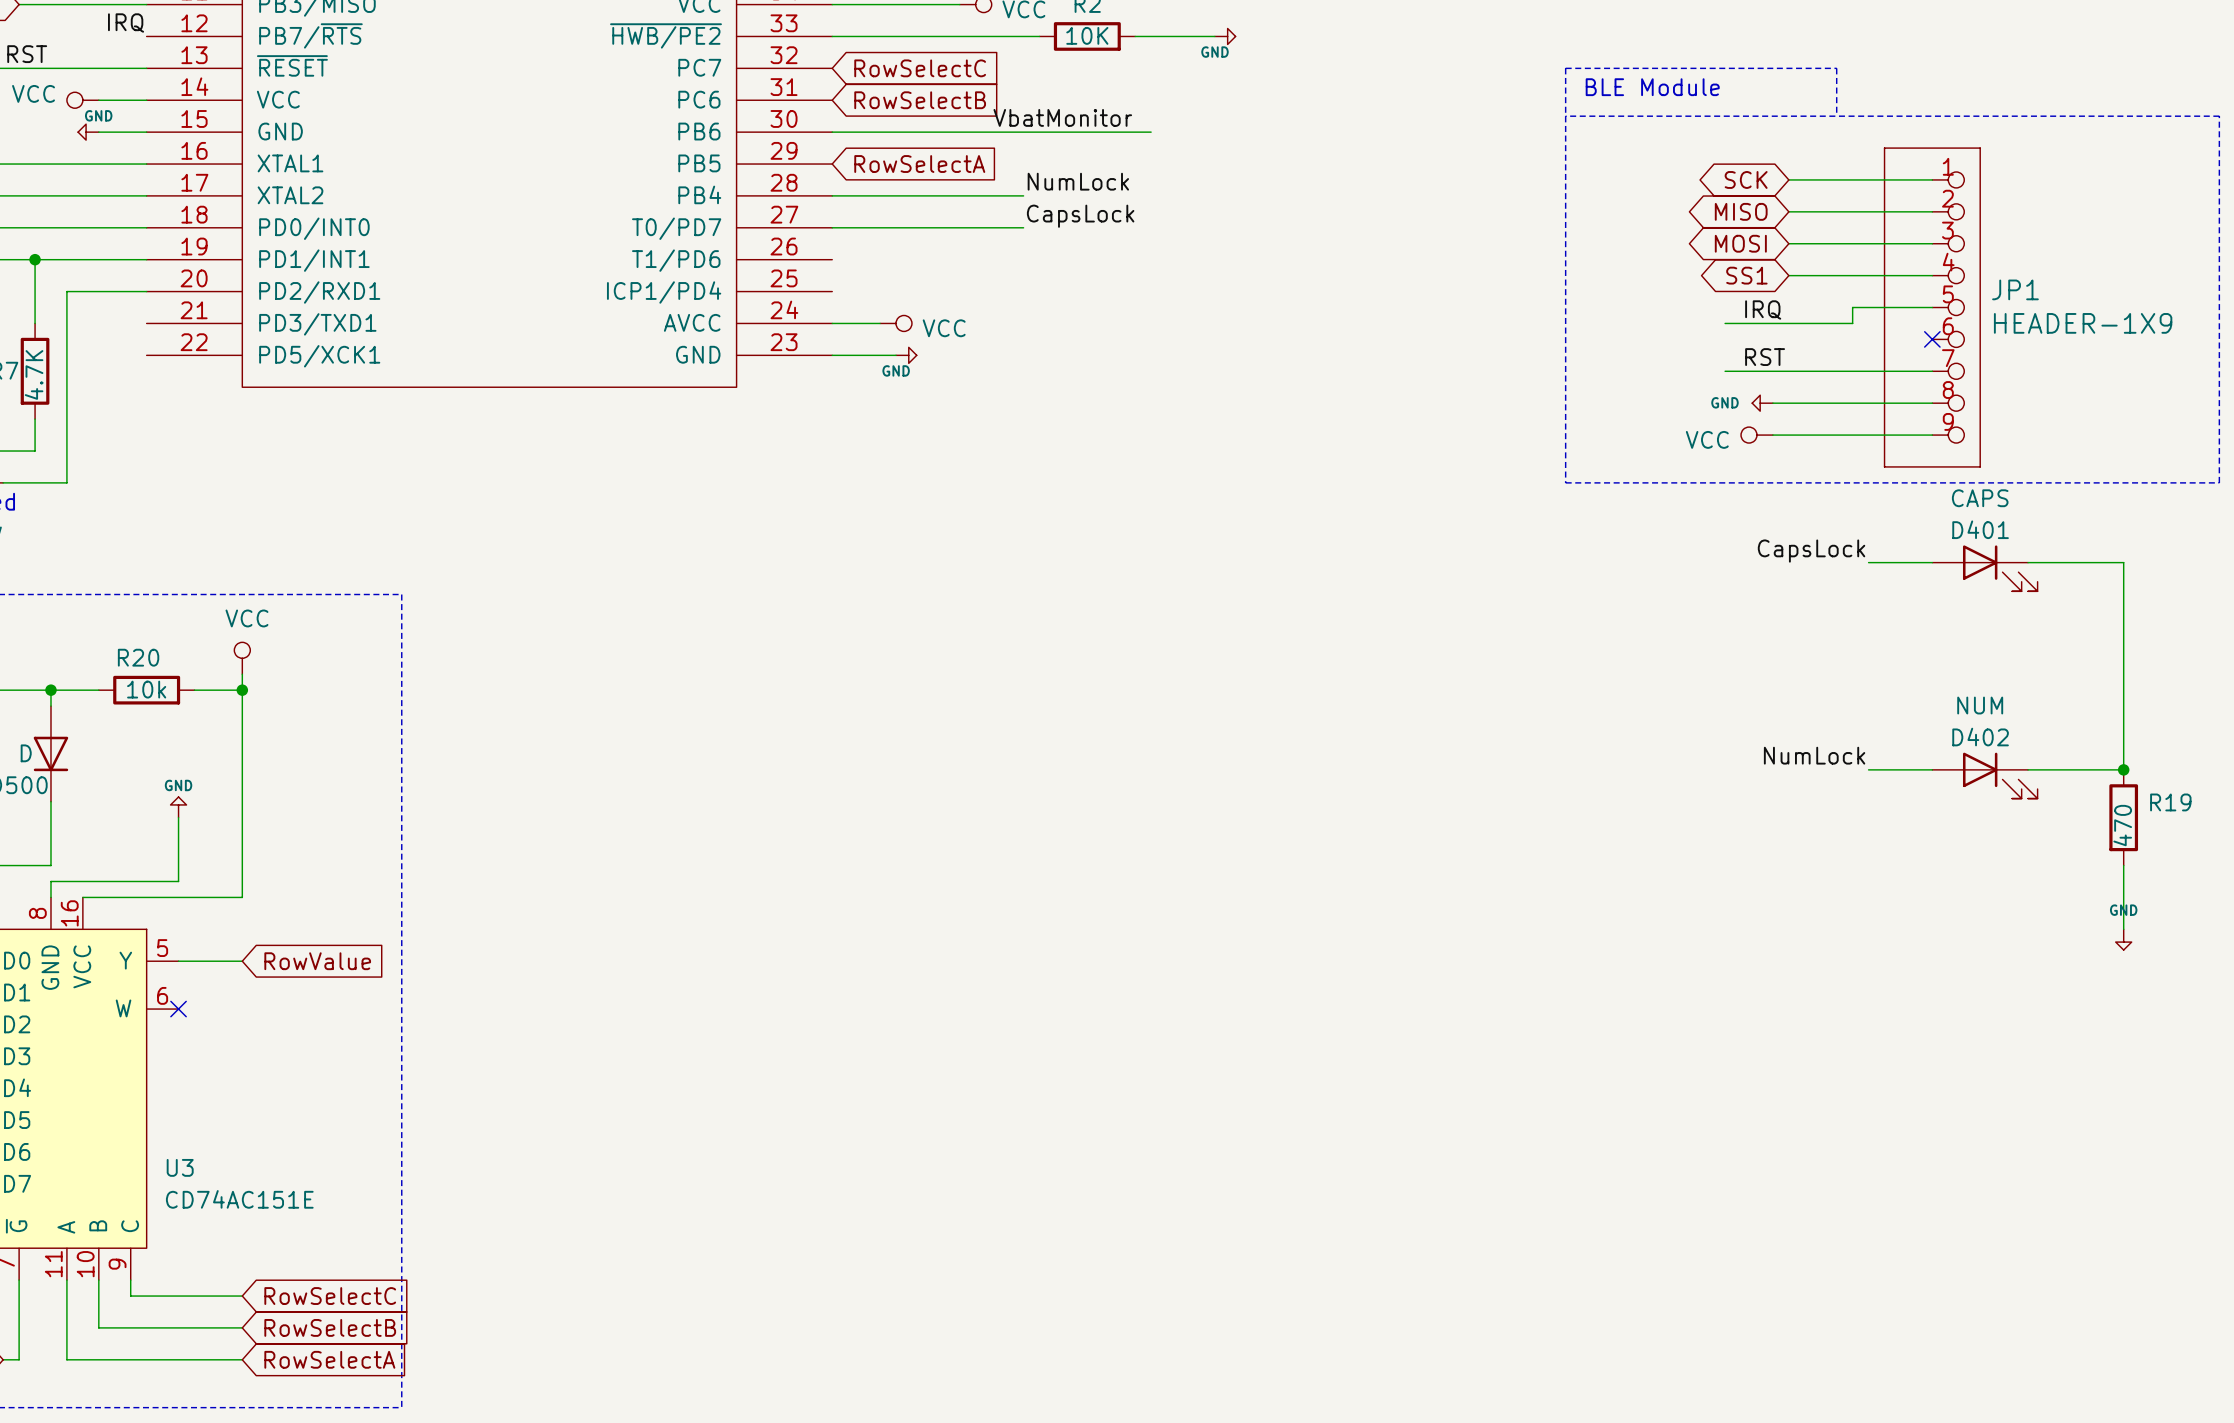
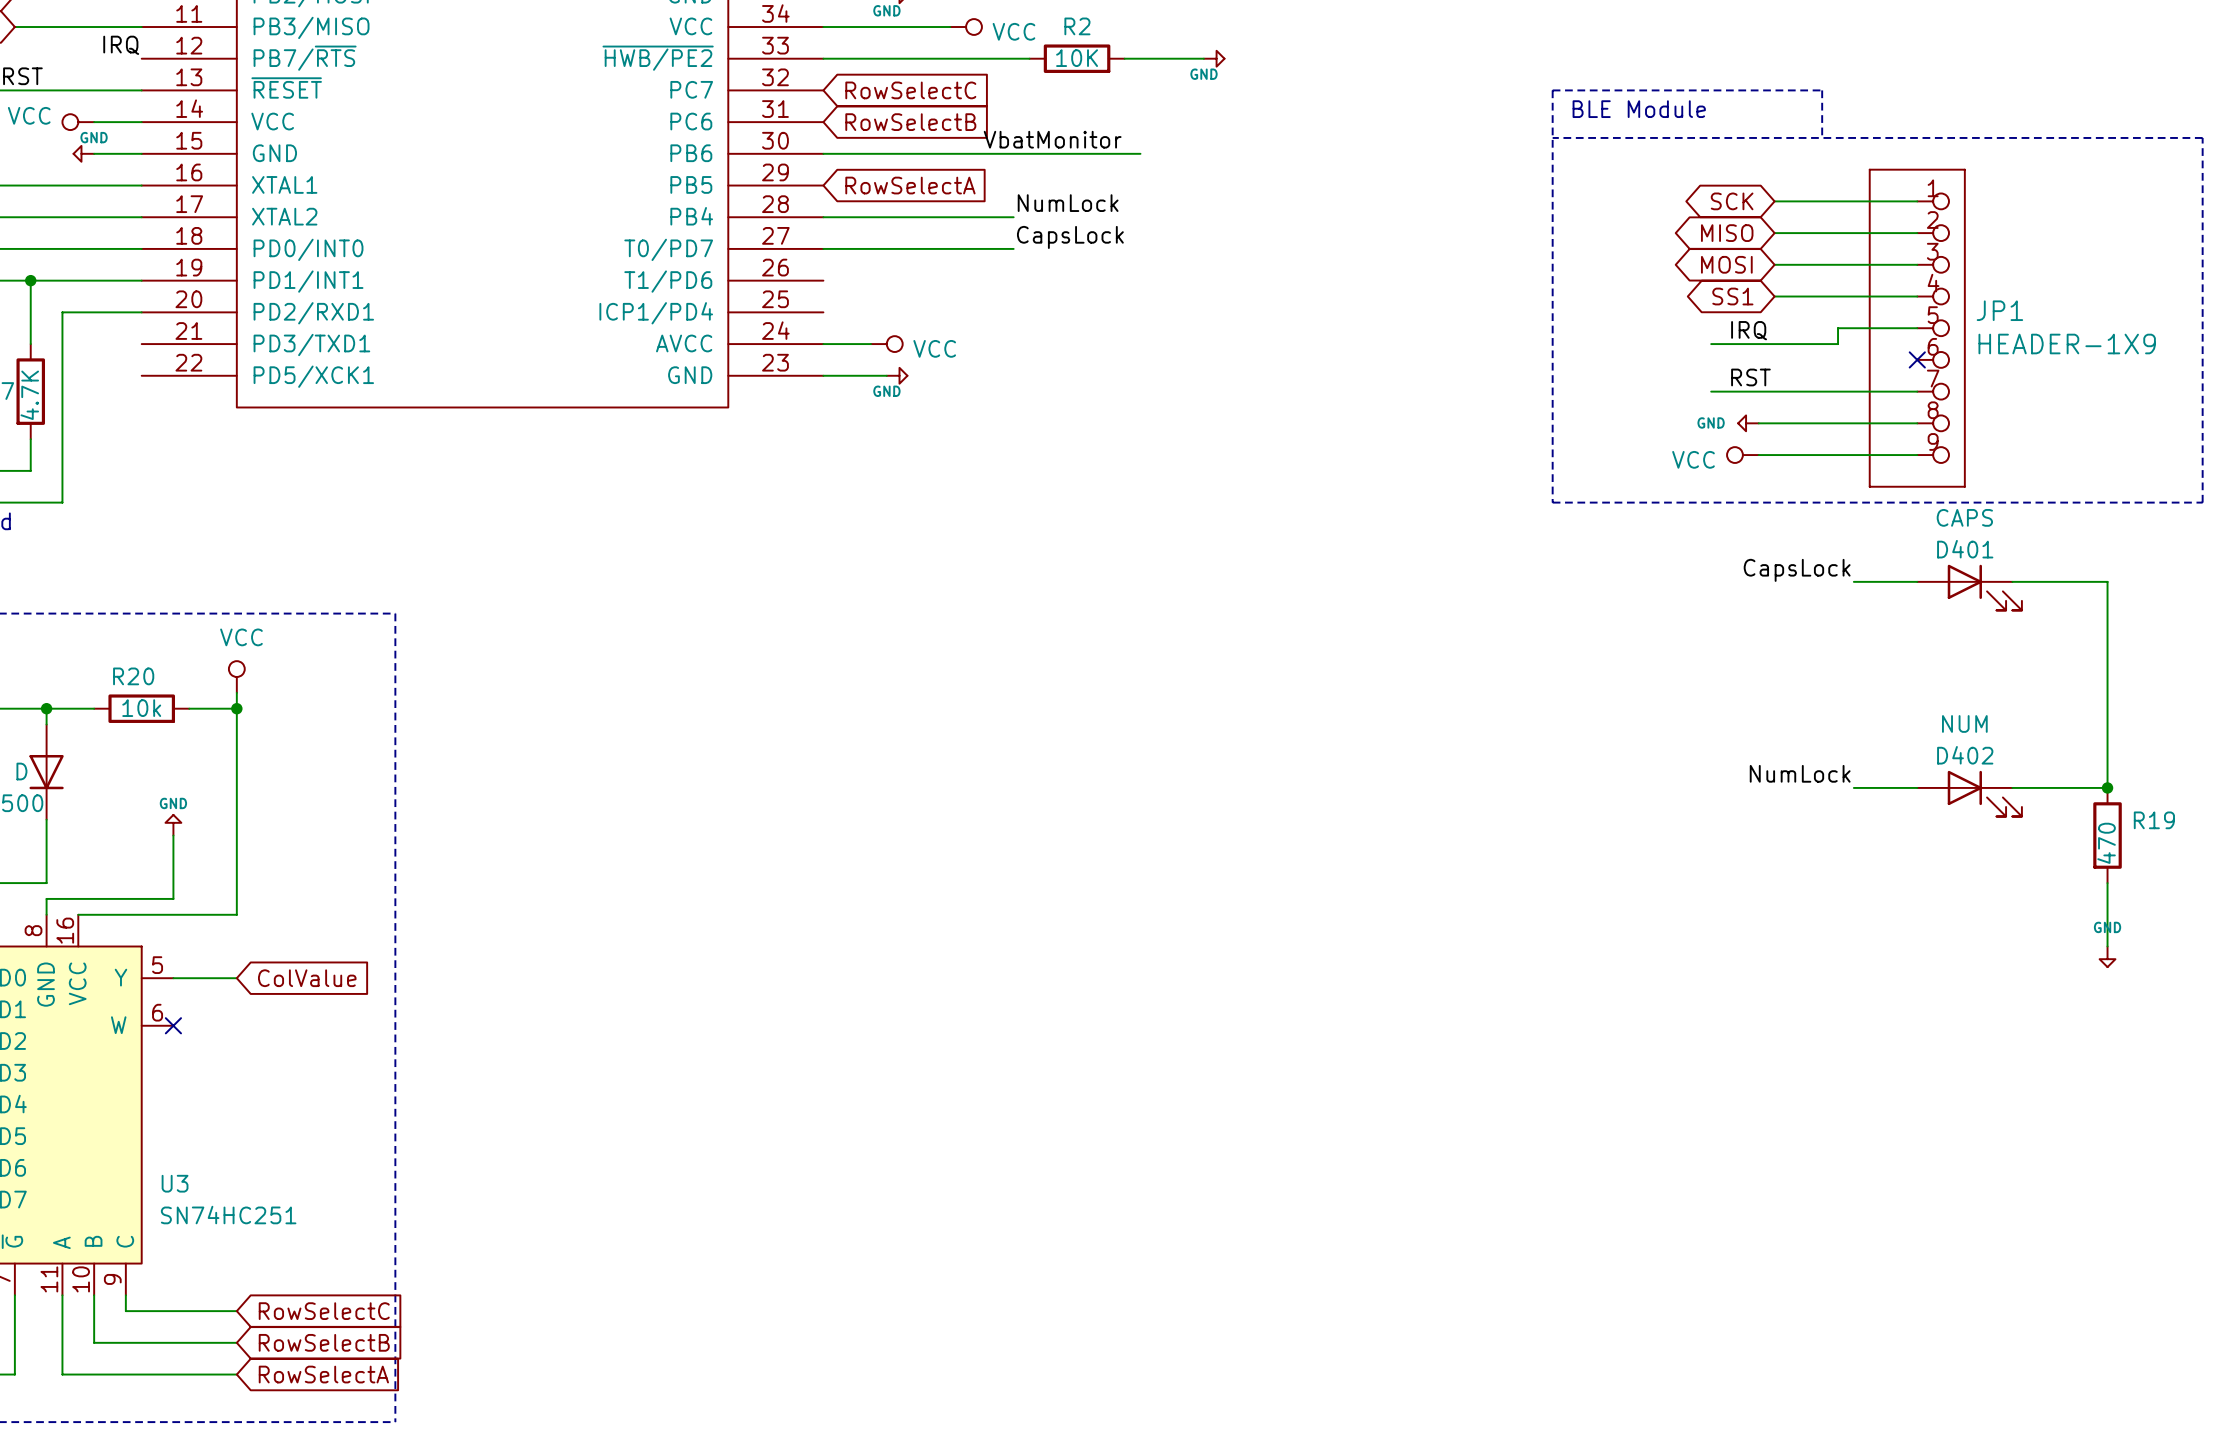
global label: RowValue (317, 961) -> ColValue (307, 978)
U3 value: CD74AC151E (239, 1199) -> SN74HC251 (228, 1215)

